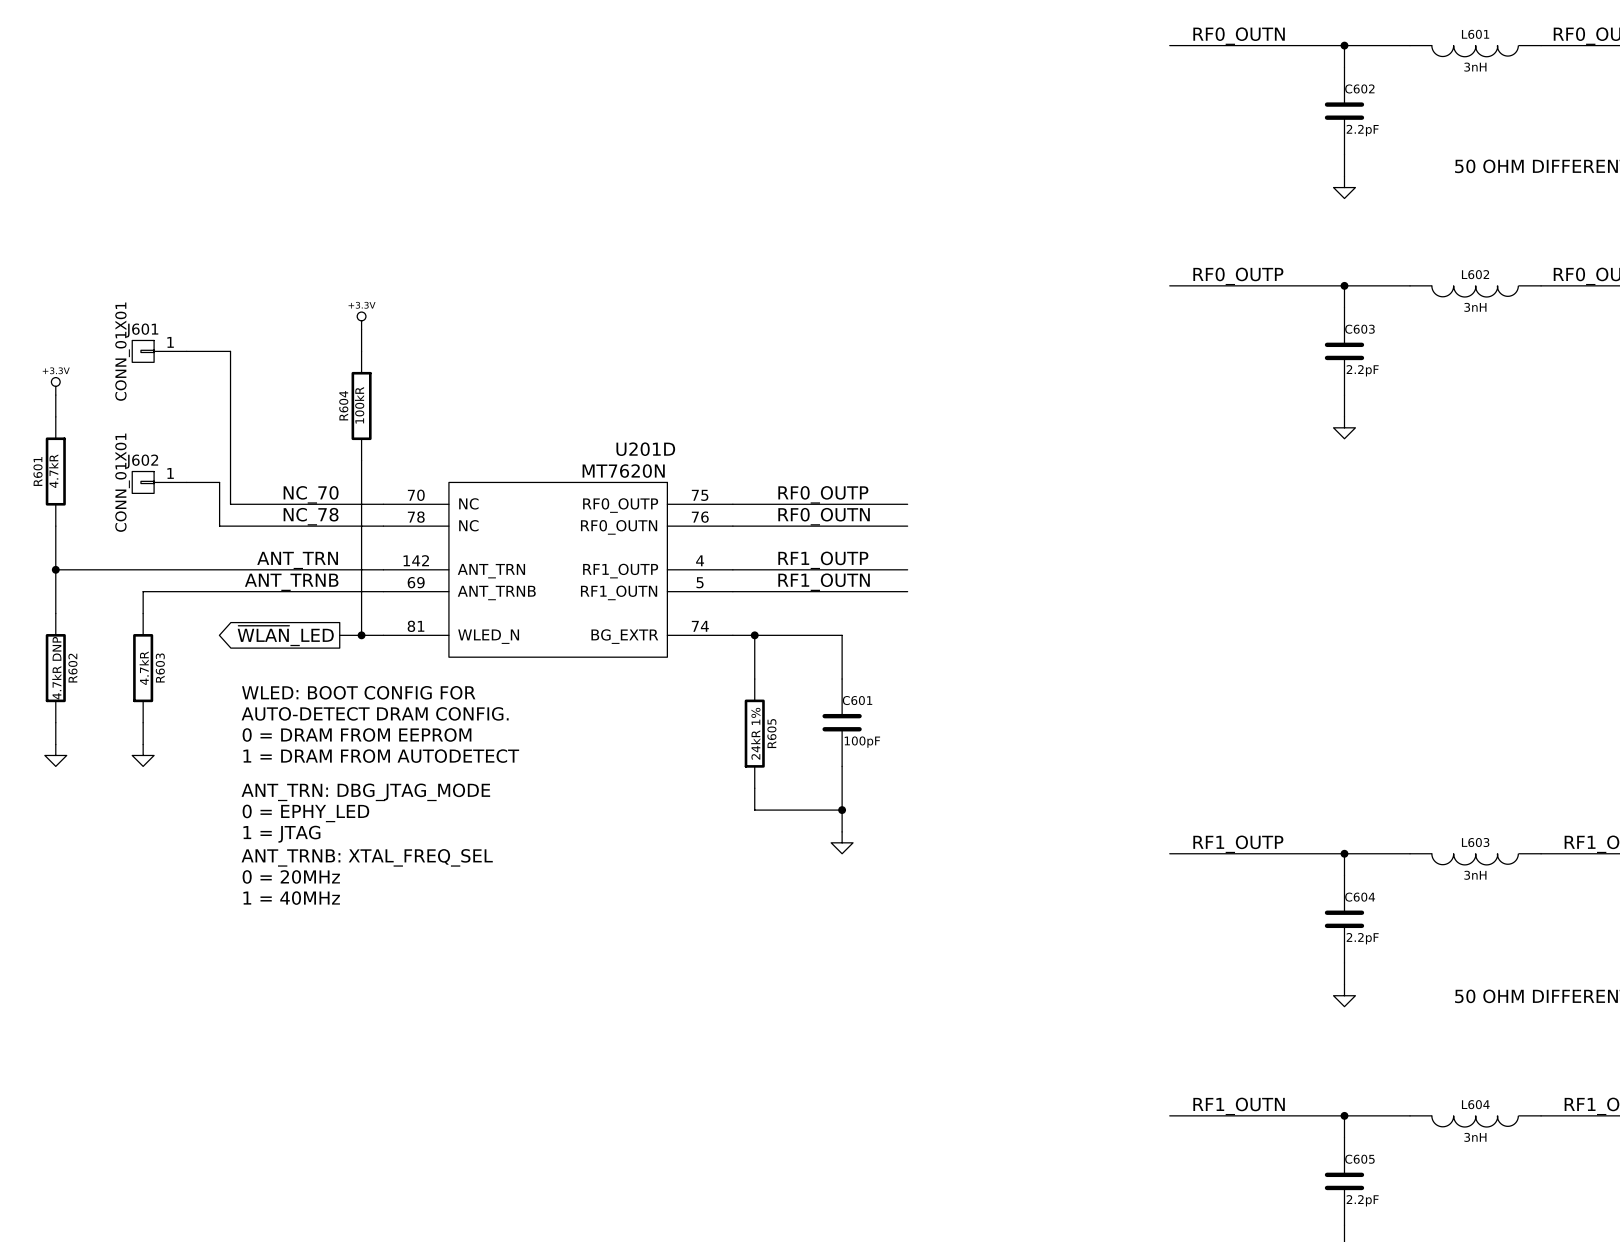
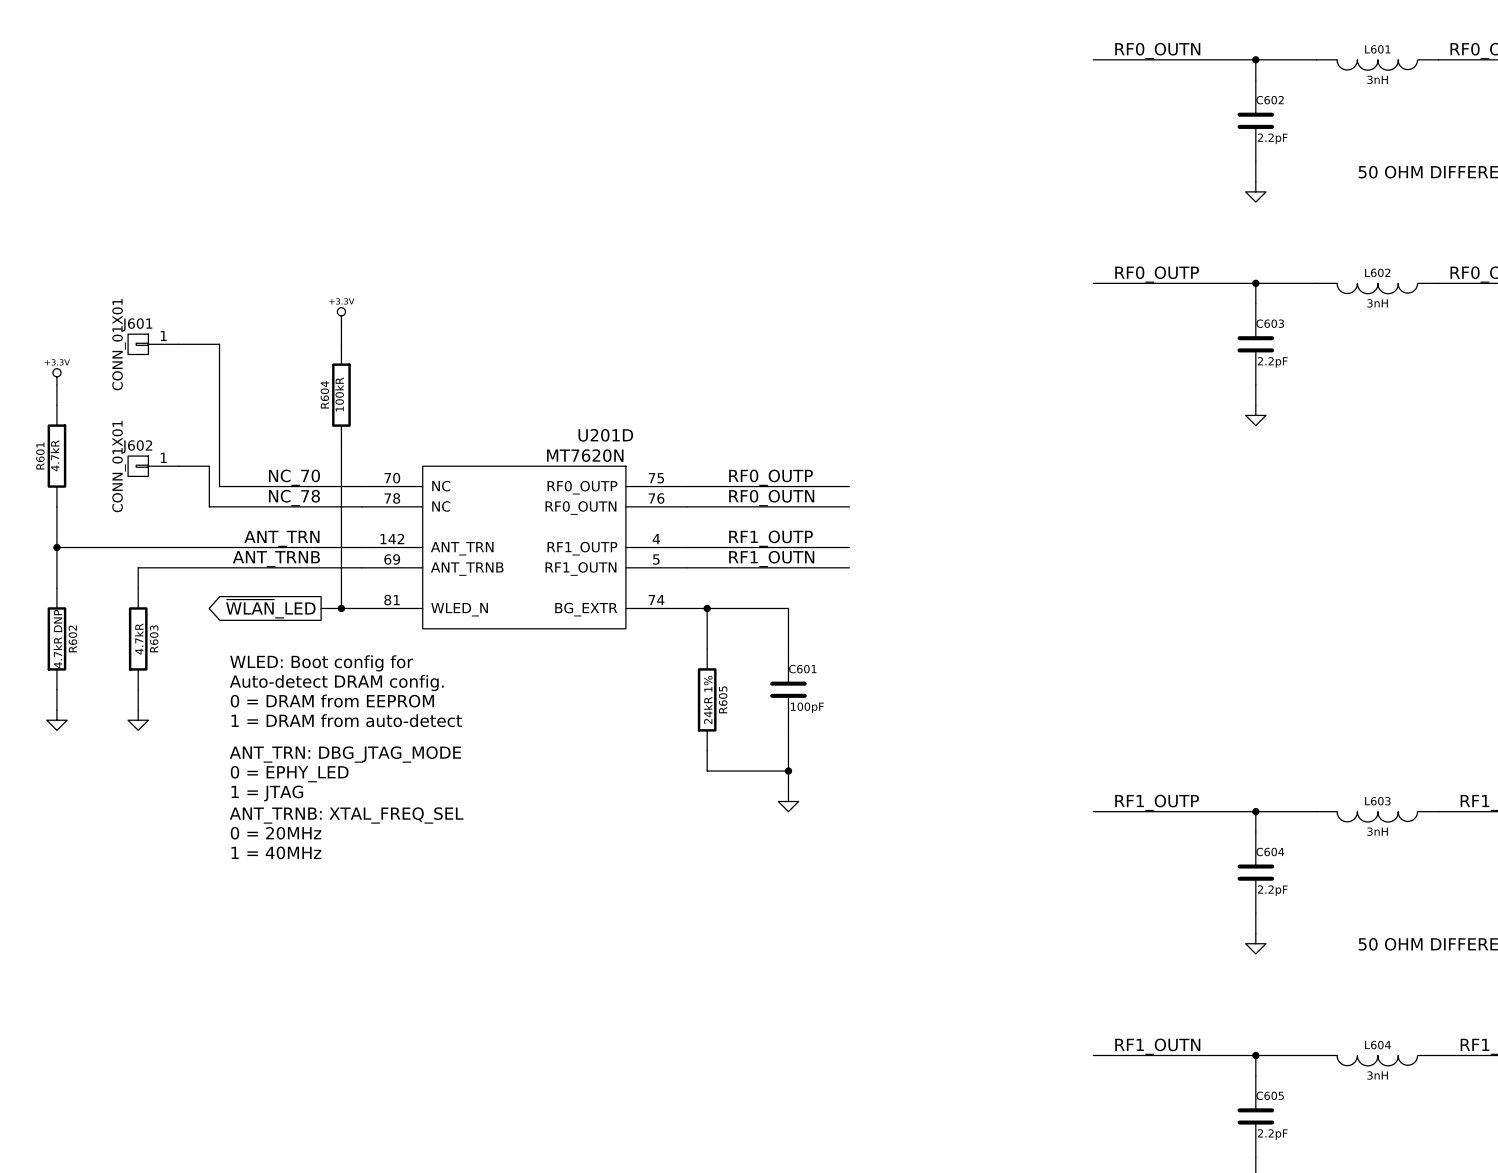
text: WLED: BOOT CONFIG FOR (358, 692) -> WLED: Boot config for (321, 663)
text: AUTO-DETECT DRAM CONFIG. (375, 713) -> Auto-detect DRAM config. (336, 683)
text: 0 = DRAM FROM EEPROM (357, 735) -> 0 = DRAM from EEPROM (332, 701)
text: 1 = DRAM FROM AUTODETECT (381, 756) -> 1 = DRAM from auto-detect (346, 720)

